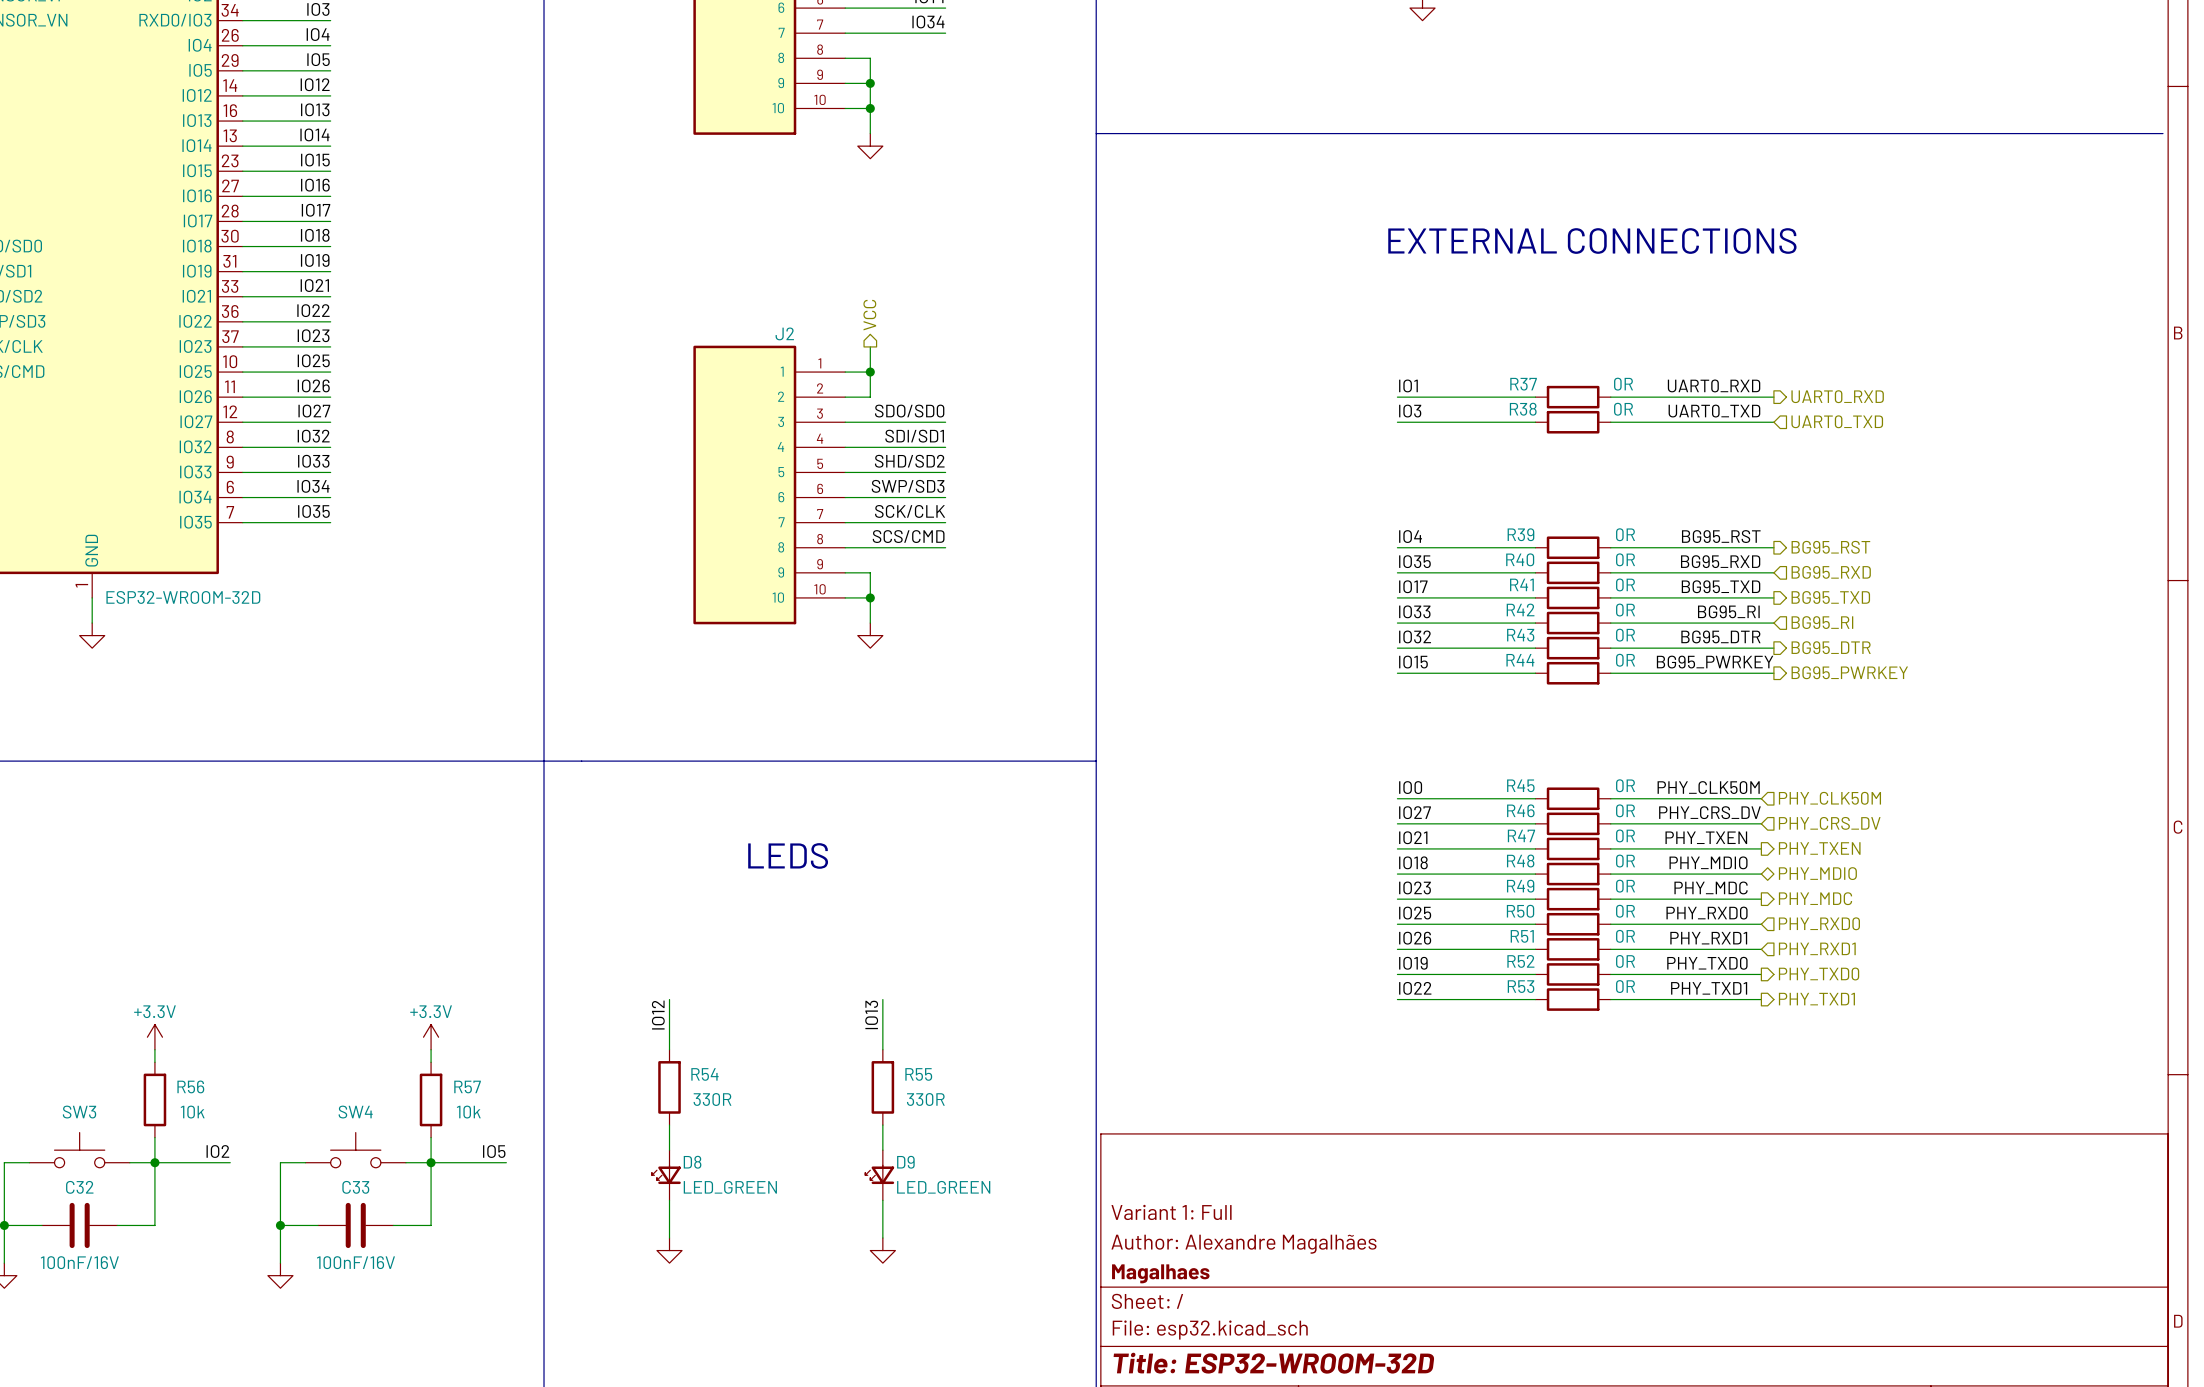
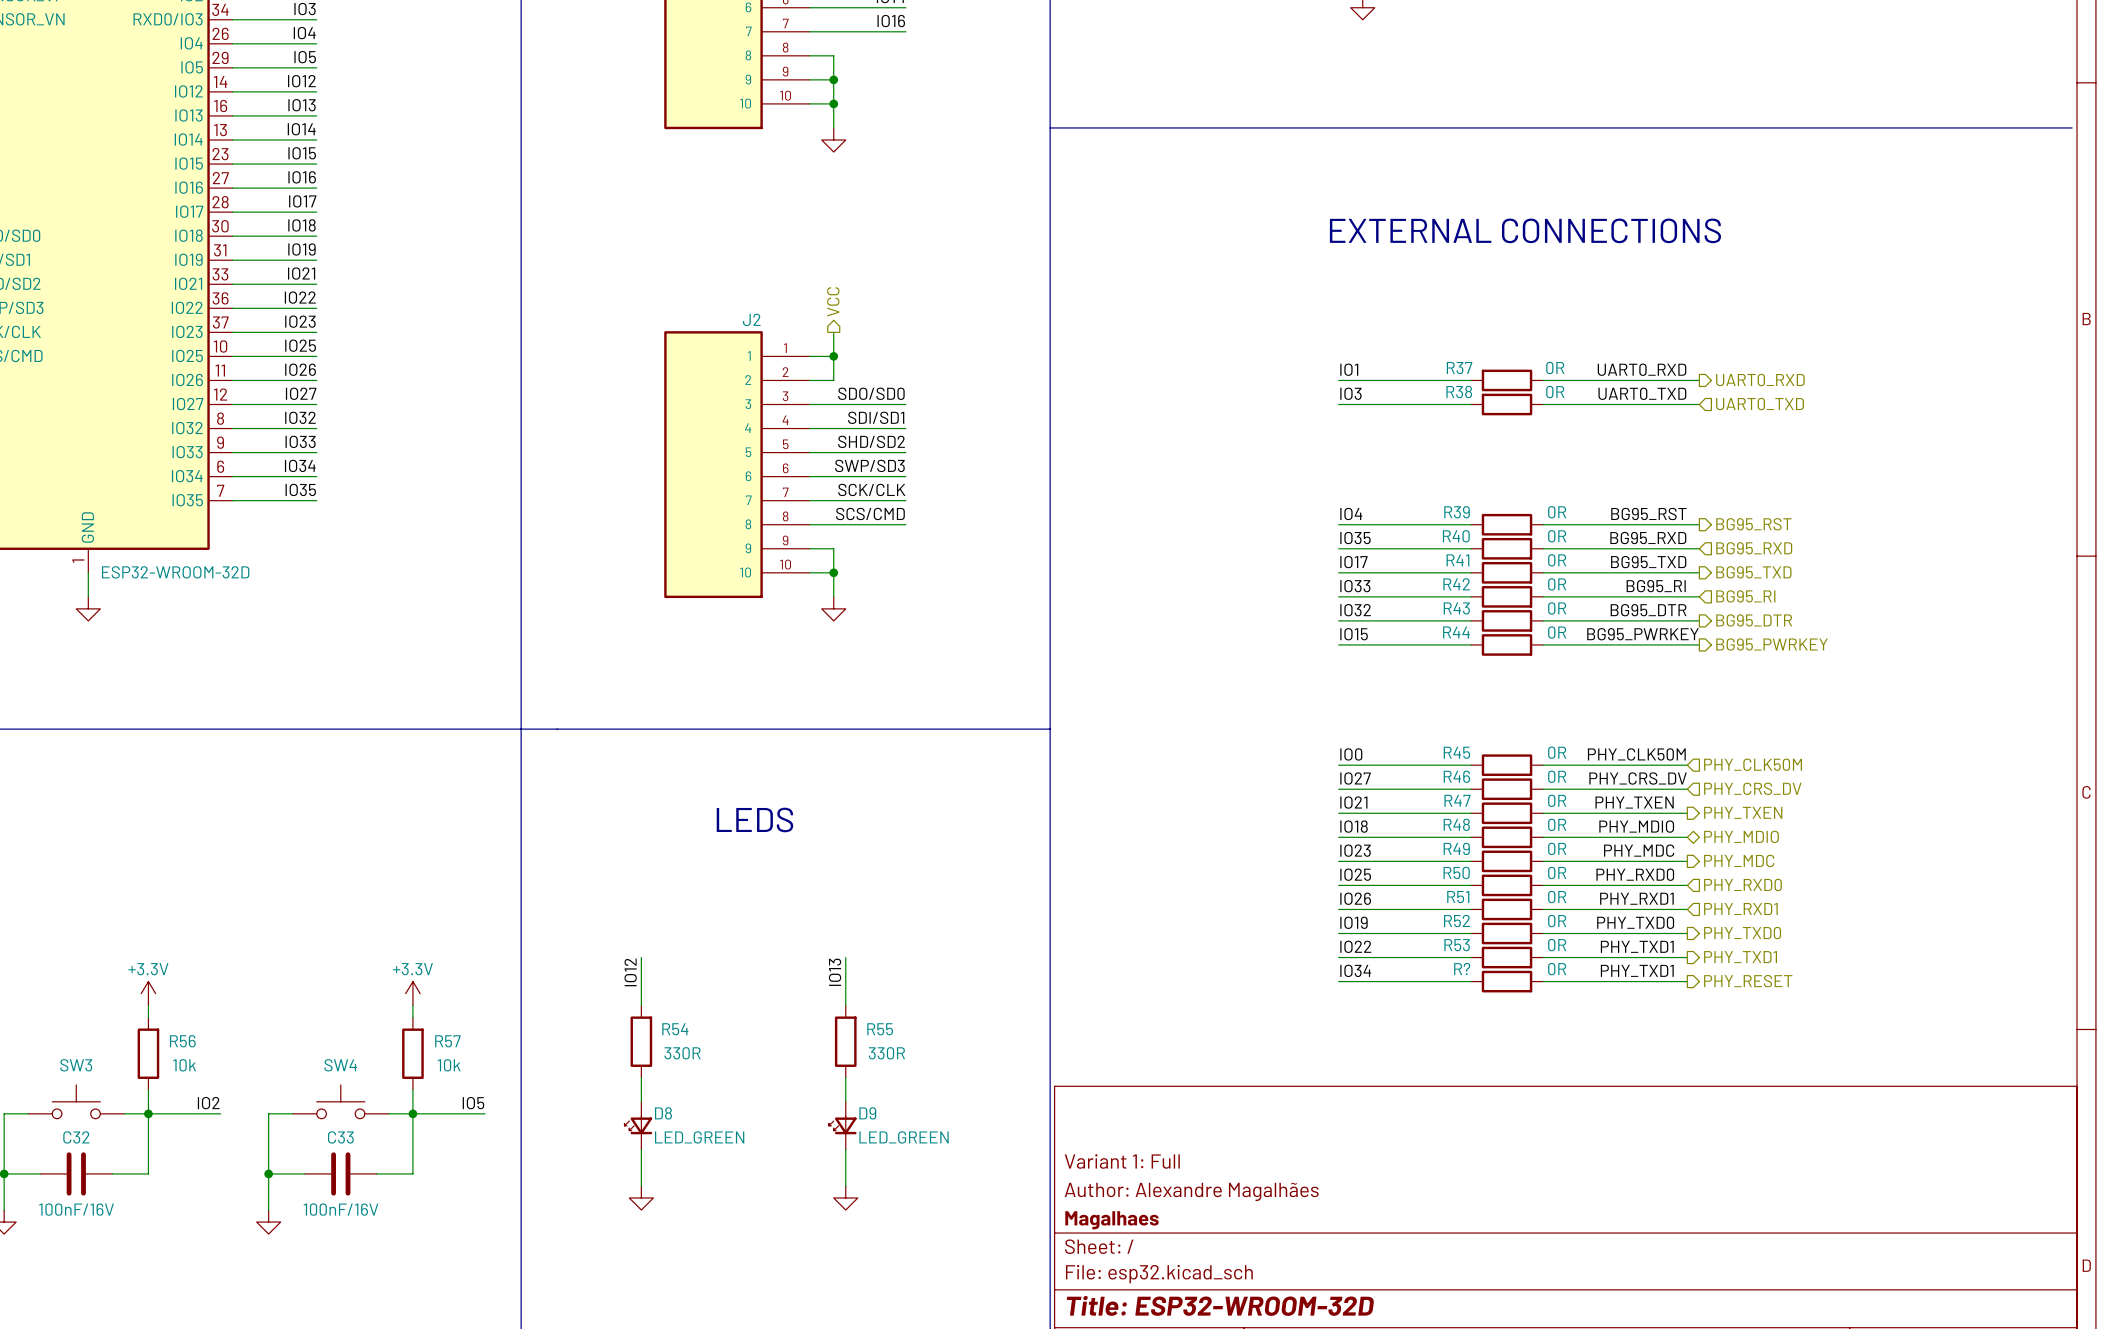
label: IO34 (928, 21) -> IO16 (891, 21)
label: none -> IO34 (1355, 970)
label: none -> PHY_TXD1 (1637, 970)
wire: none -> (1338, 981) (1470, 981)
R?: none -> 0R (1507, 981)
wire: none -> (1543, 981) (1687, 981)
hierarchical label: none -> PHY_RESET (1748, 981)

